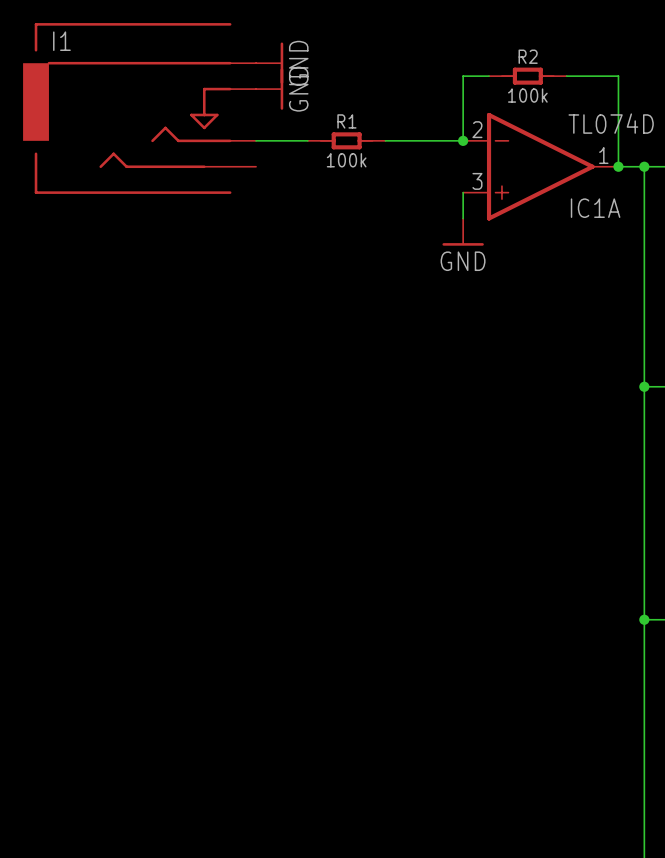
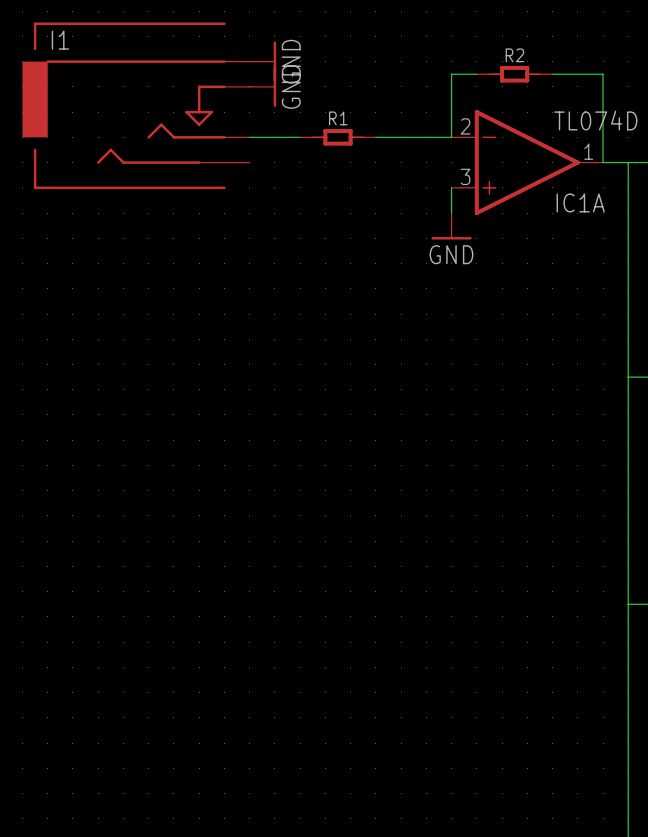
R2 value: 100k (527, 95) -> none
junction: (463, 140) -> none
R1 value: 100k (346, 160) -> none
junction: (618, 166) -> none
junction: (644, 166) -> none
junction: (644, 386) -> none
junction: (644, 619) -> none

